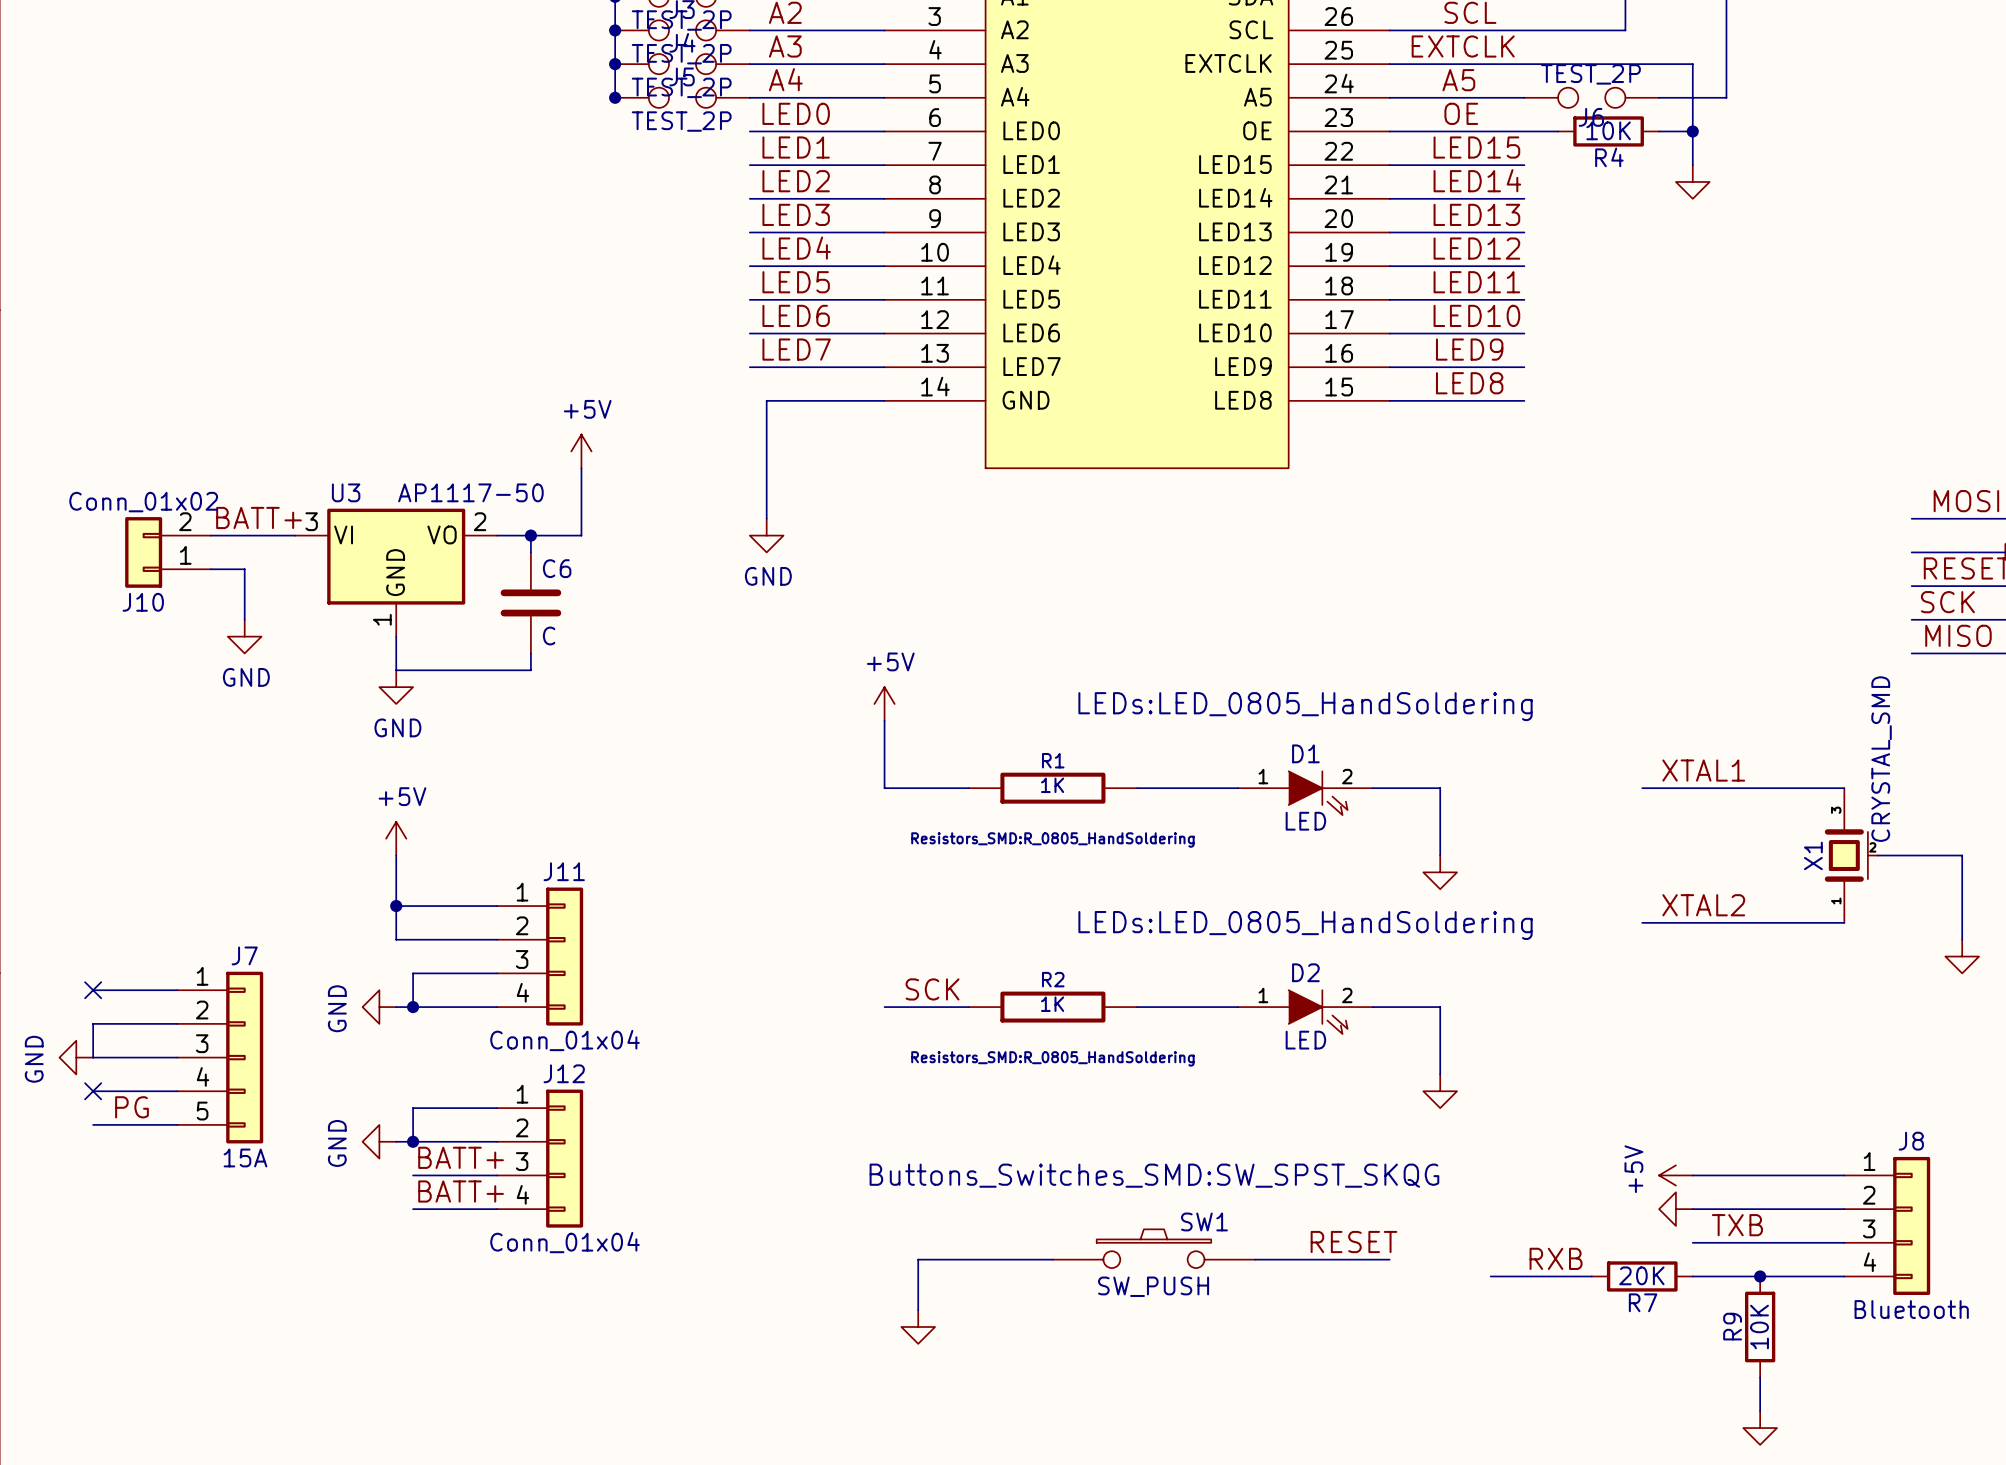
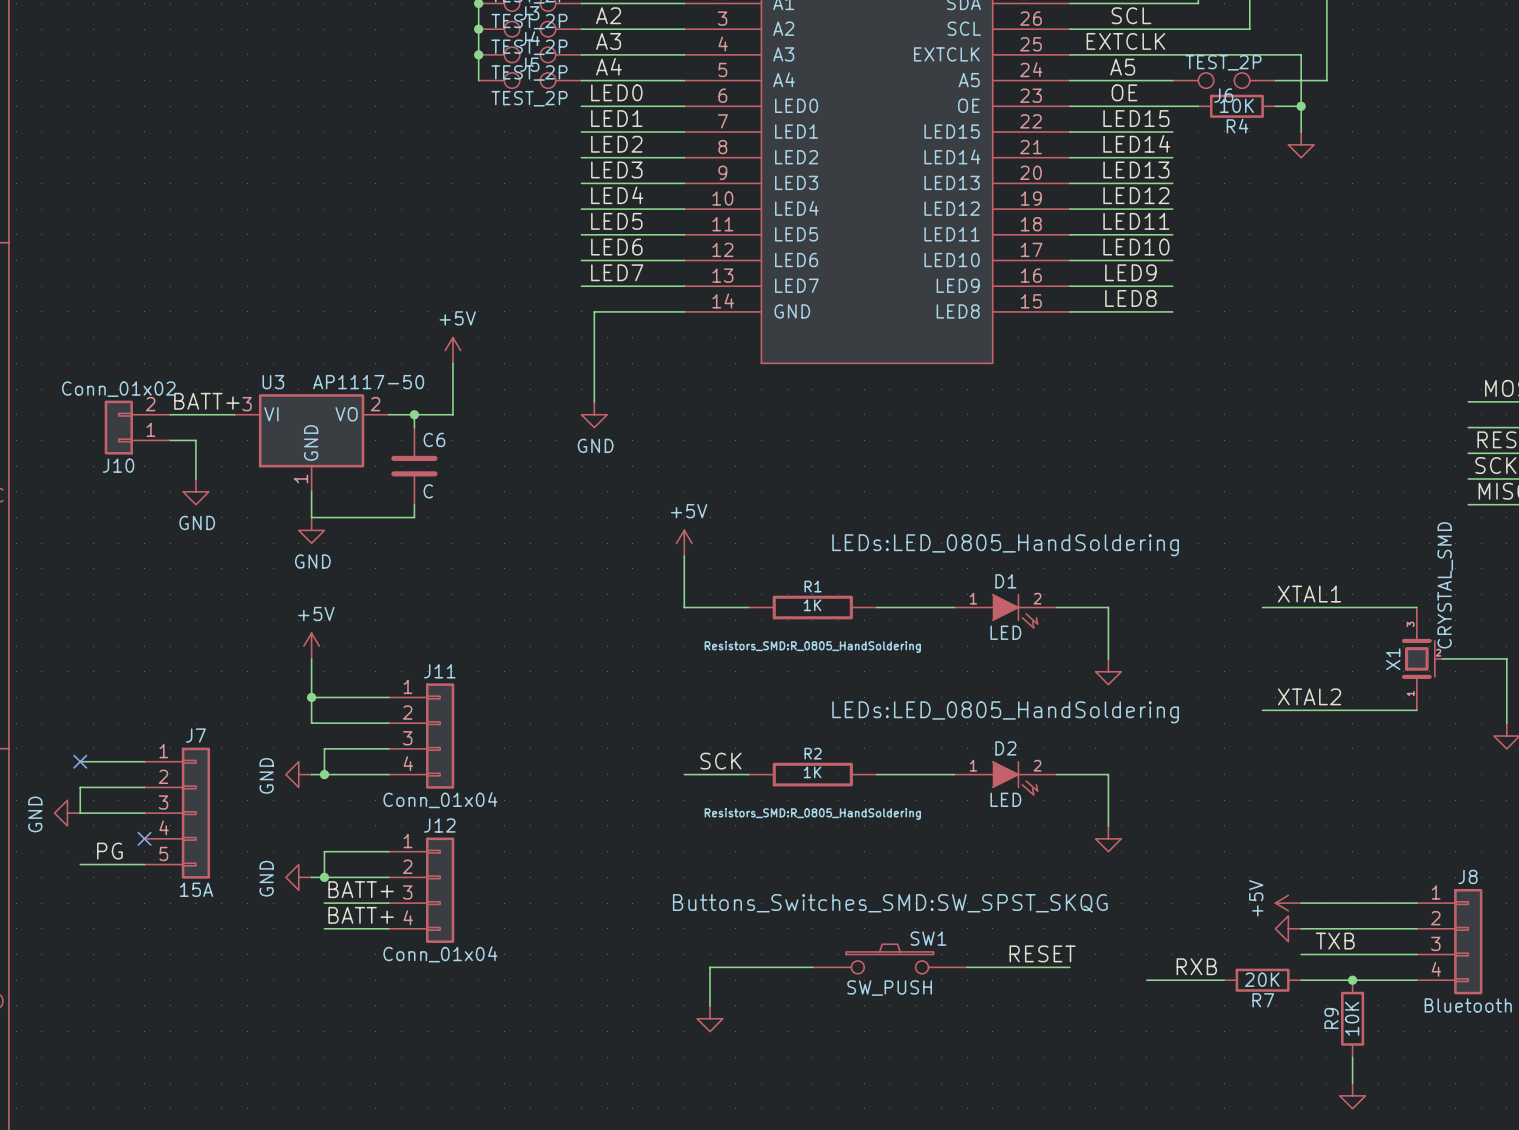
junction: (615, 97) -> none
wire: (93, 1091) (177, 1091) -> none
no-connect mark: (93, 1091) -> none
no-connect mark: none -> (144, 838)

